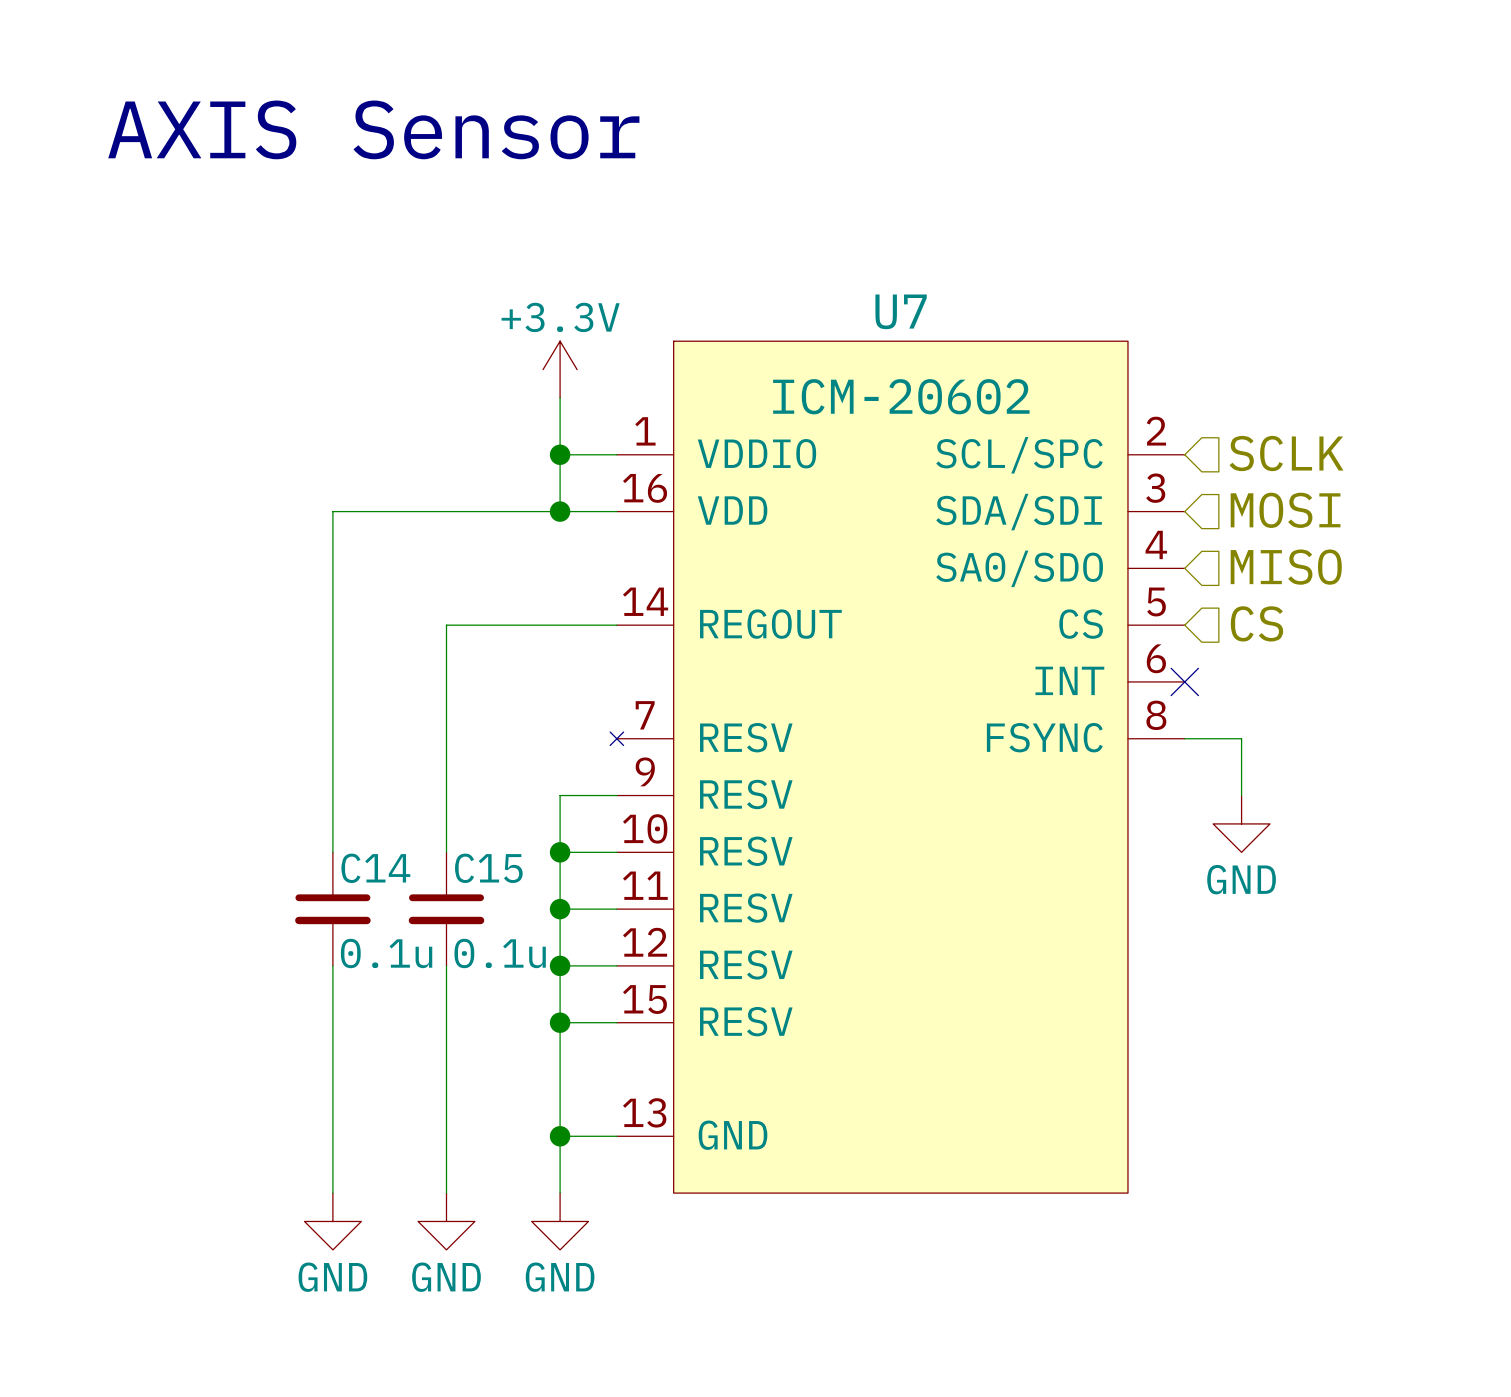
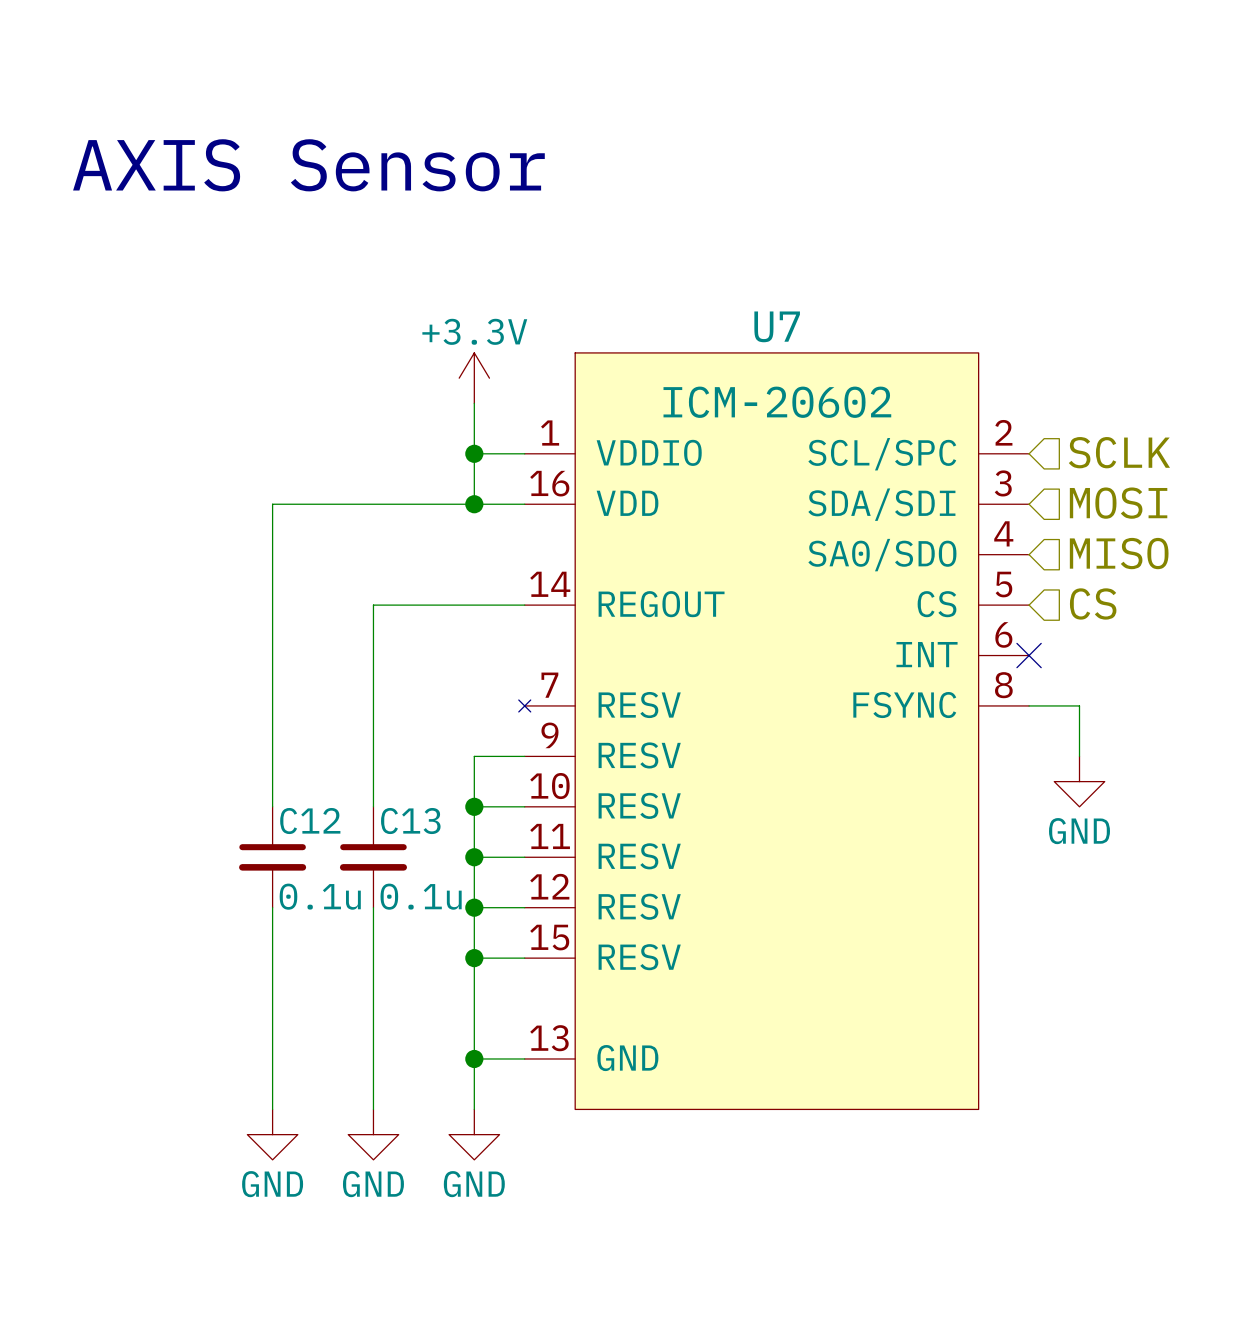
C14 name: C14 (375, 868) -> C12 (310, 821)
C15 name: C15 (488, 868) -> C13 (410, 821)

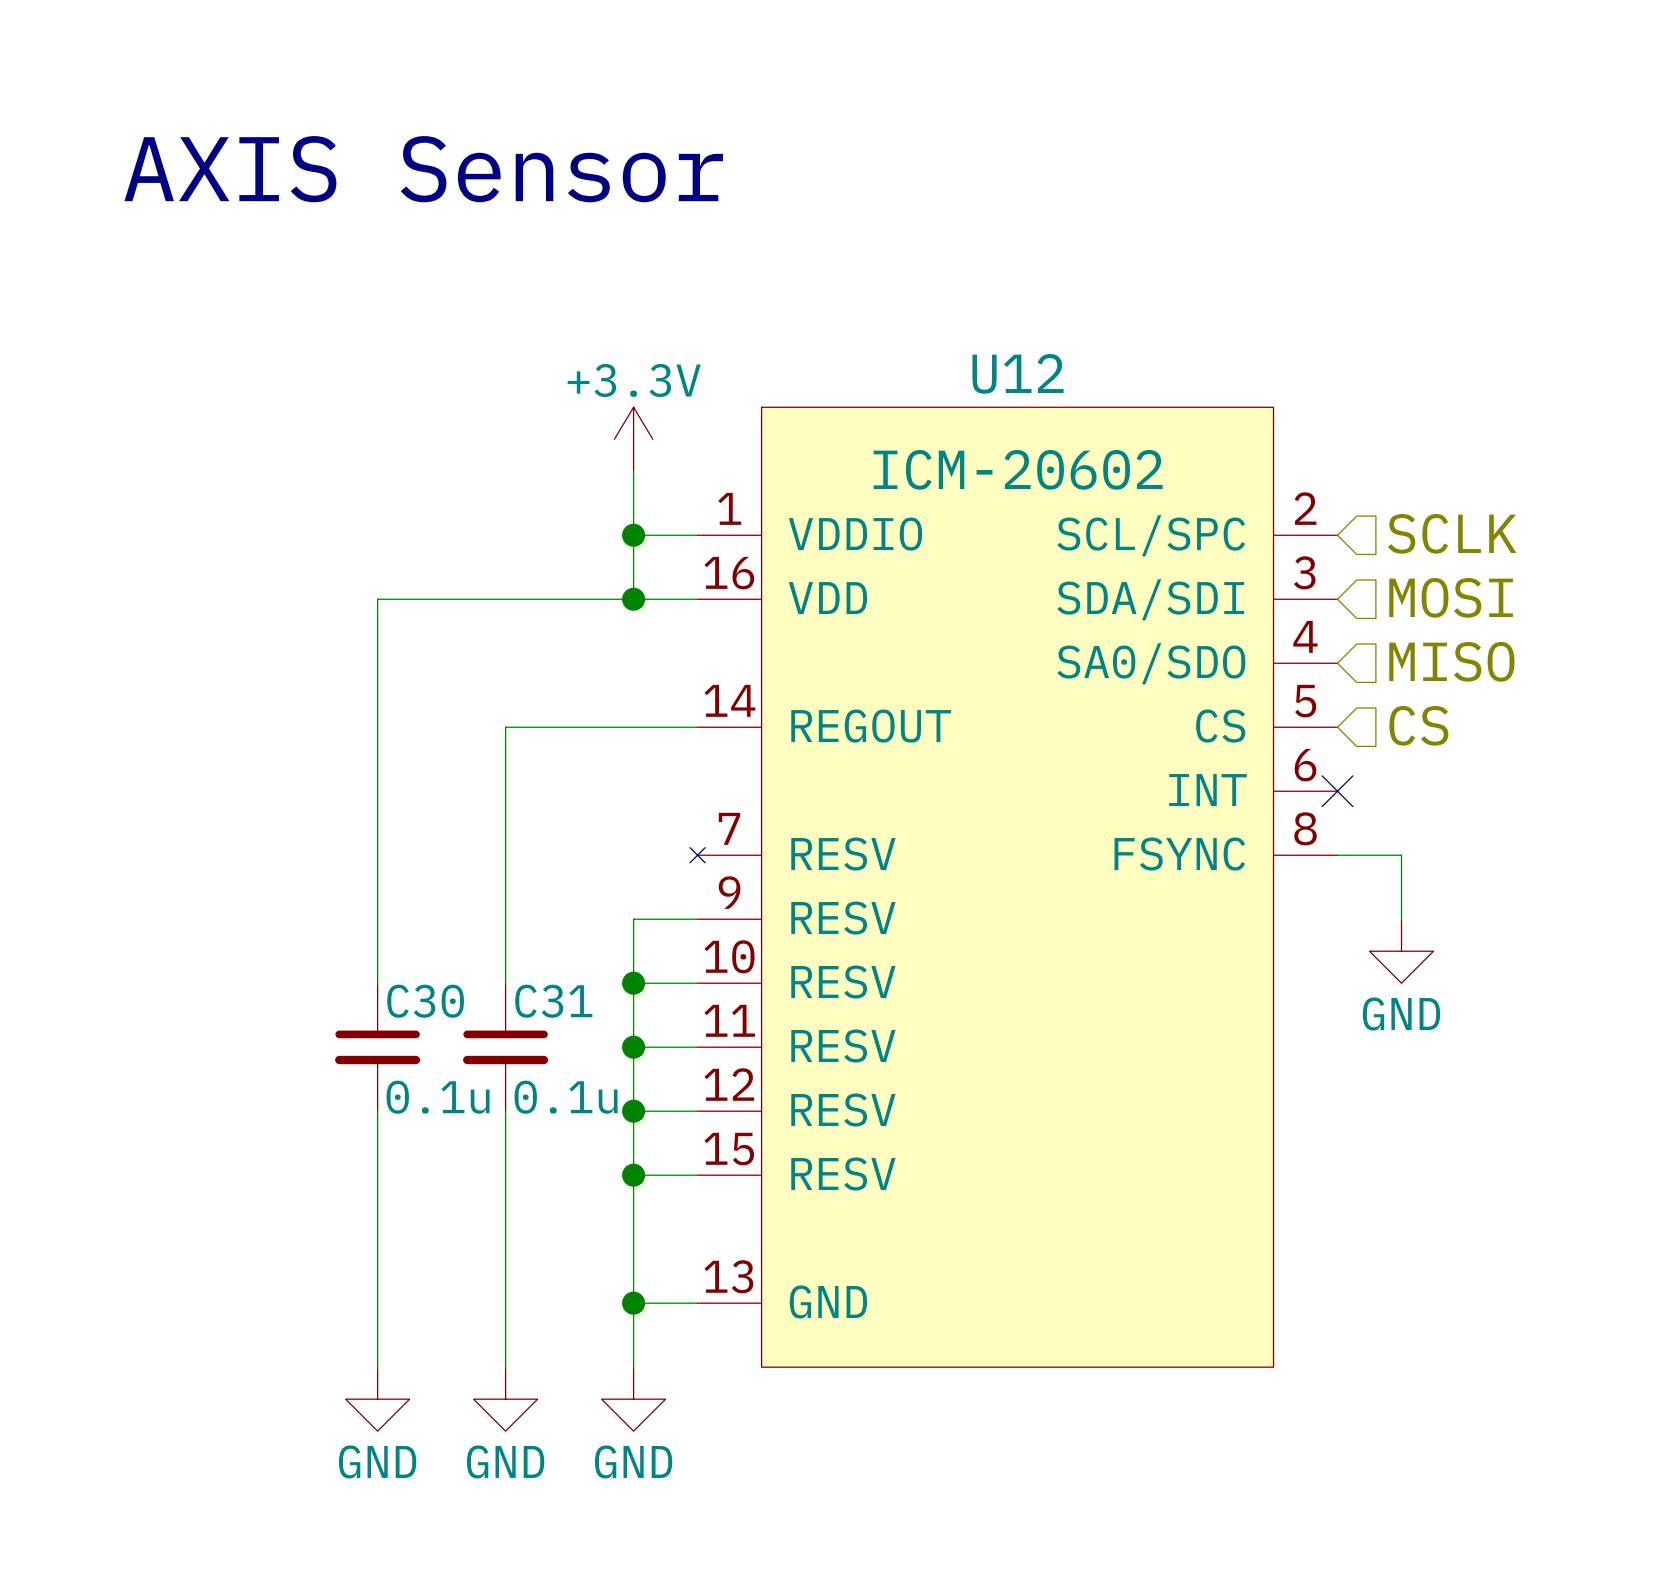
U7 name: U7 (777, 326) -> U12 (1018, 373)
C12 name: C12 (310, 821) -> C30 (425, 1001)
C13 name: C13 (410, 821) -> C31 (553, 1001)

